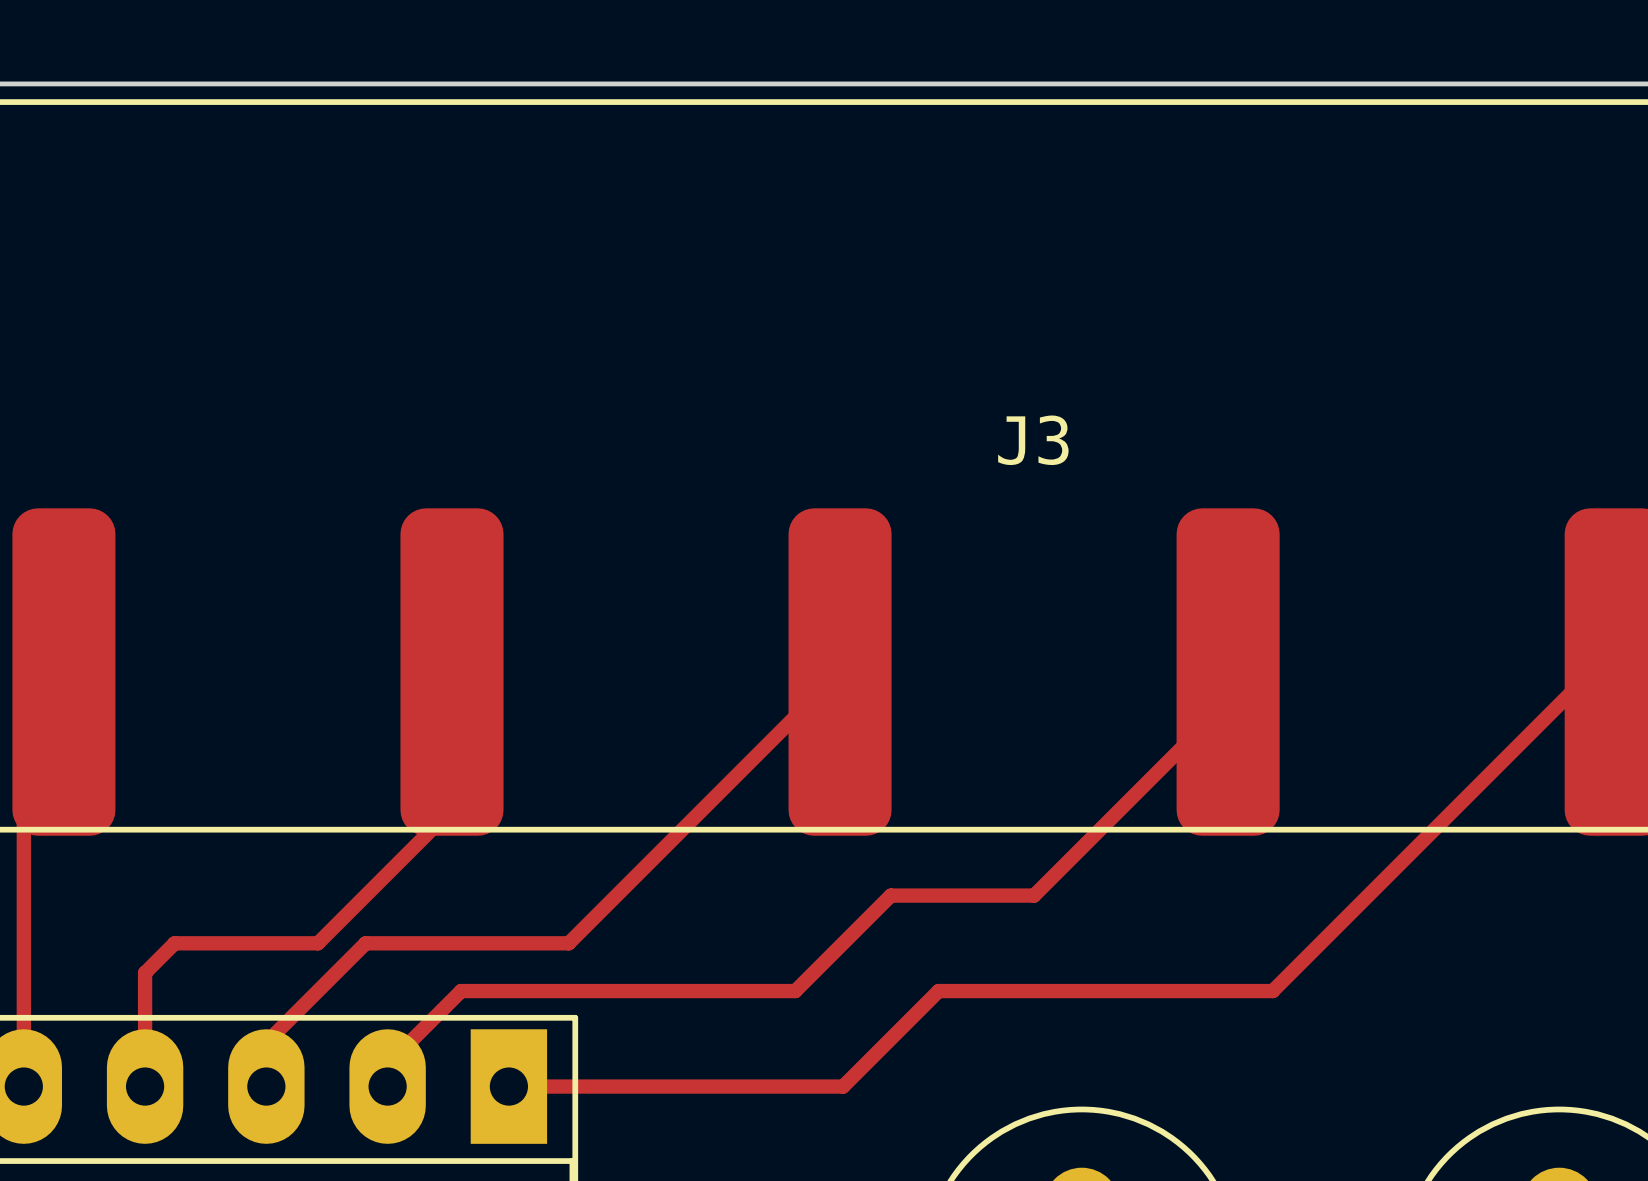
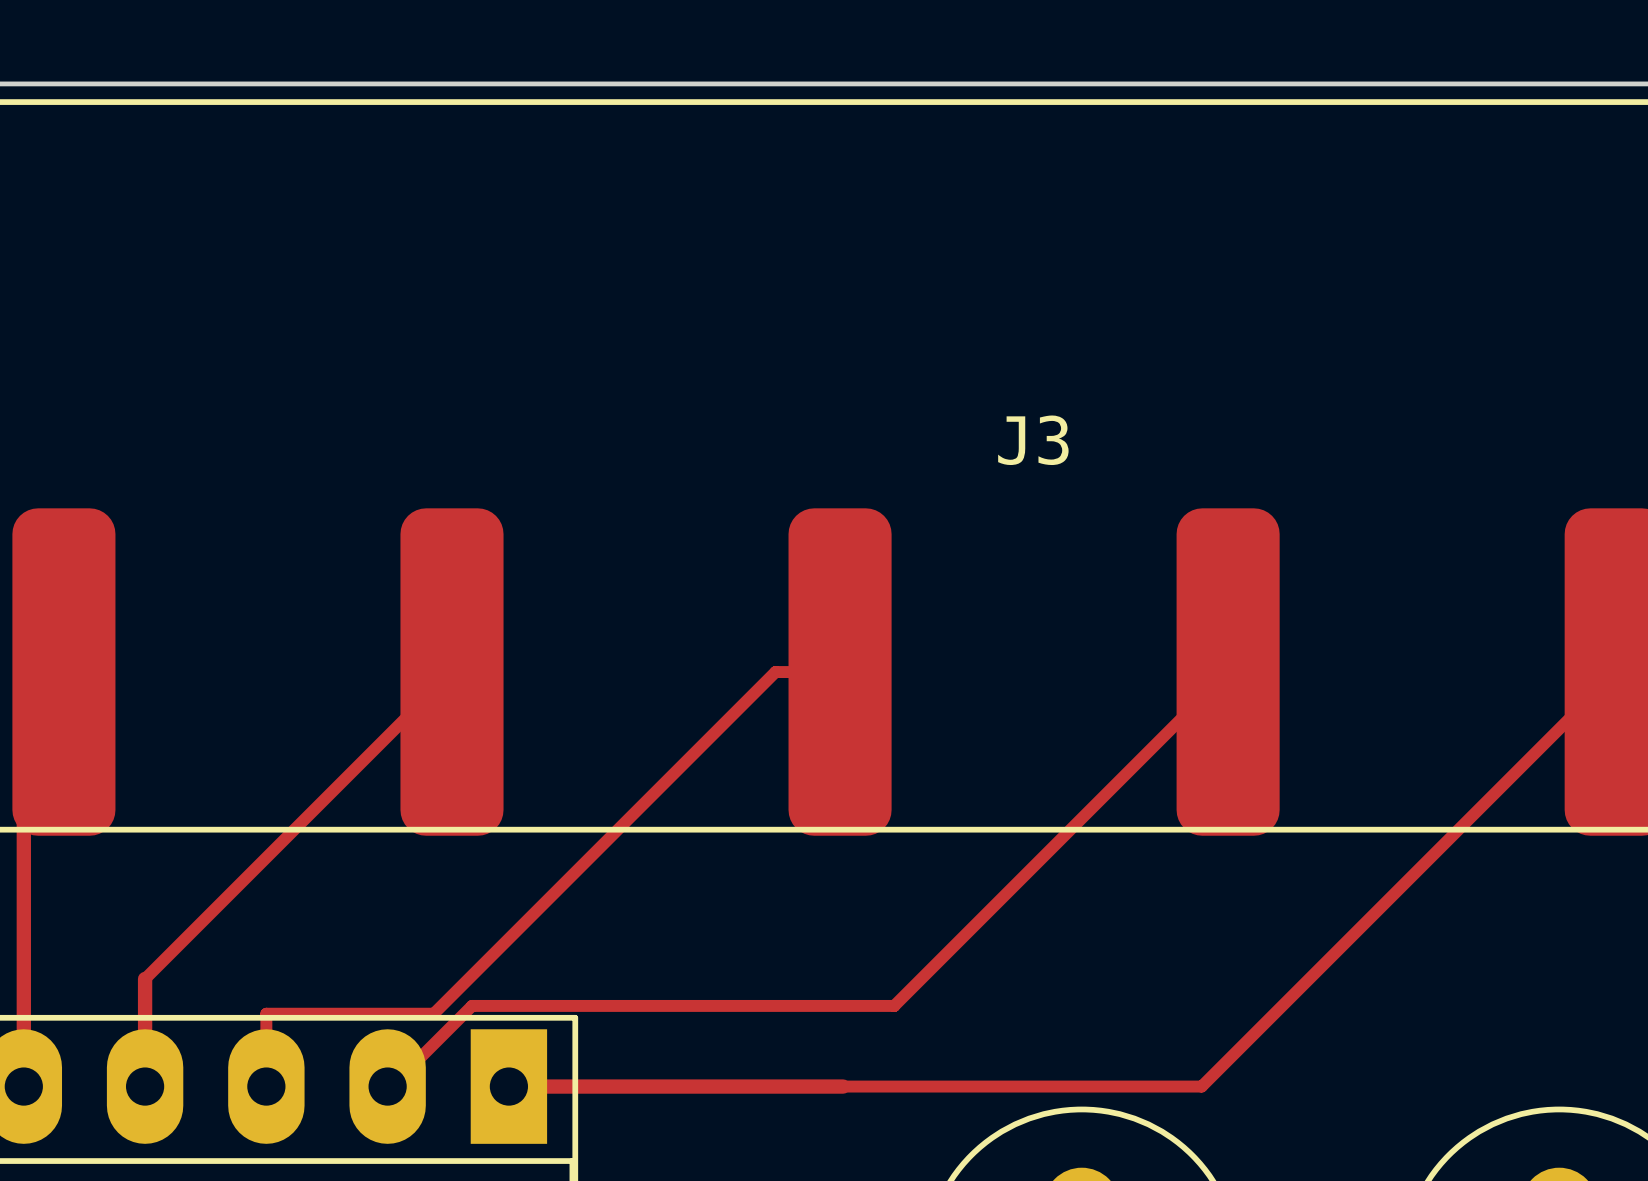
track: (451, 672) (451, 809) (317, 943) (174, 943) (145, 972) (145, 978) -> (451, 672) (145, 978)
track: (840, 672) (568, 943) (365, 943) (266, 1042) -> (840, 672) (775, 672) (433, 1013) (266, 1013) (266, 1042)
track: (1228, 672) (1228, 701) (1034, 895) (890, 895) (795, 991) (461, 991) (387, 1064) (387, 1086) -> (1228, 672) (894, 1005) (472, 1005) (391, 1086) (387, 1086)
track: (1616, 672) (1591, 672) (1272, 991) (938, 991) (843, 1086) -> (1616, 672) (1201, 1086) (843, 1086)

